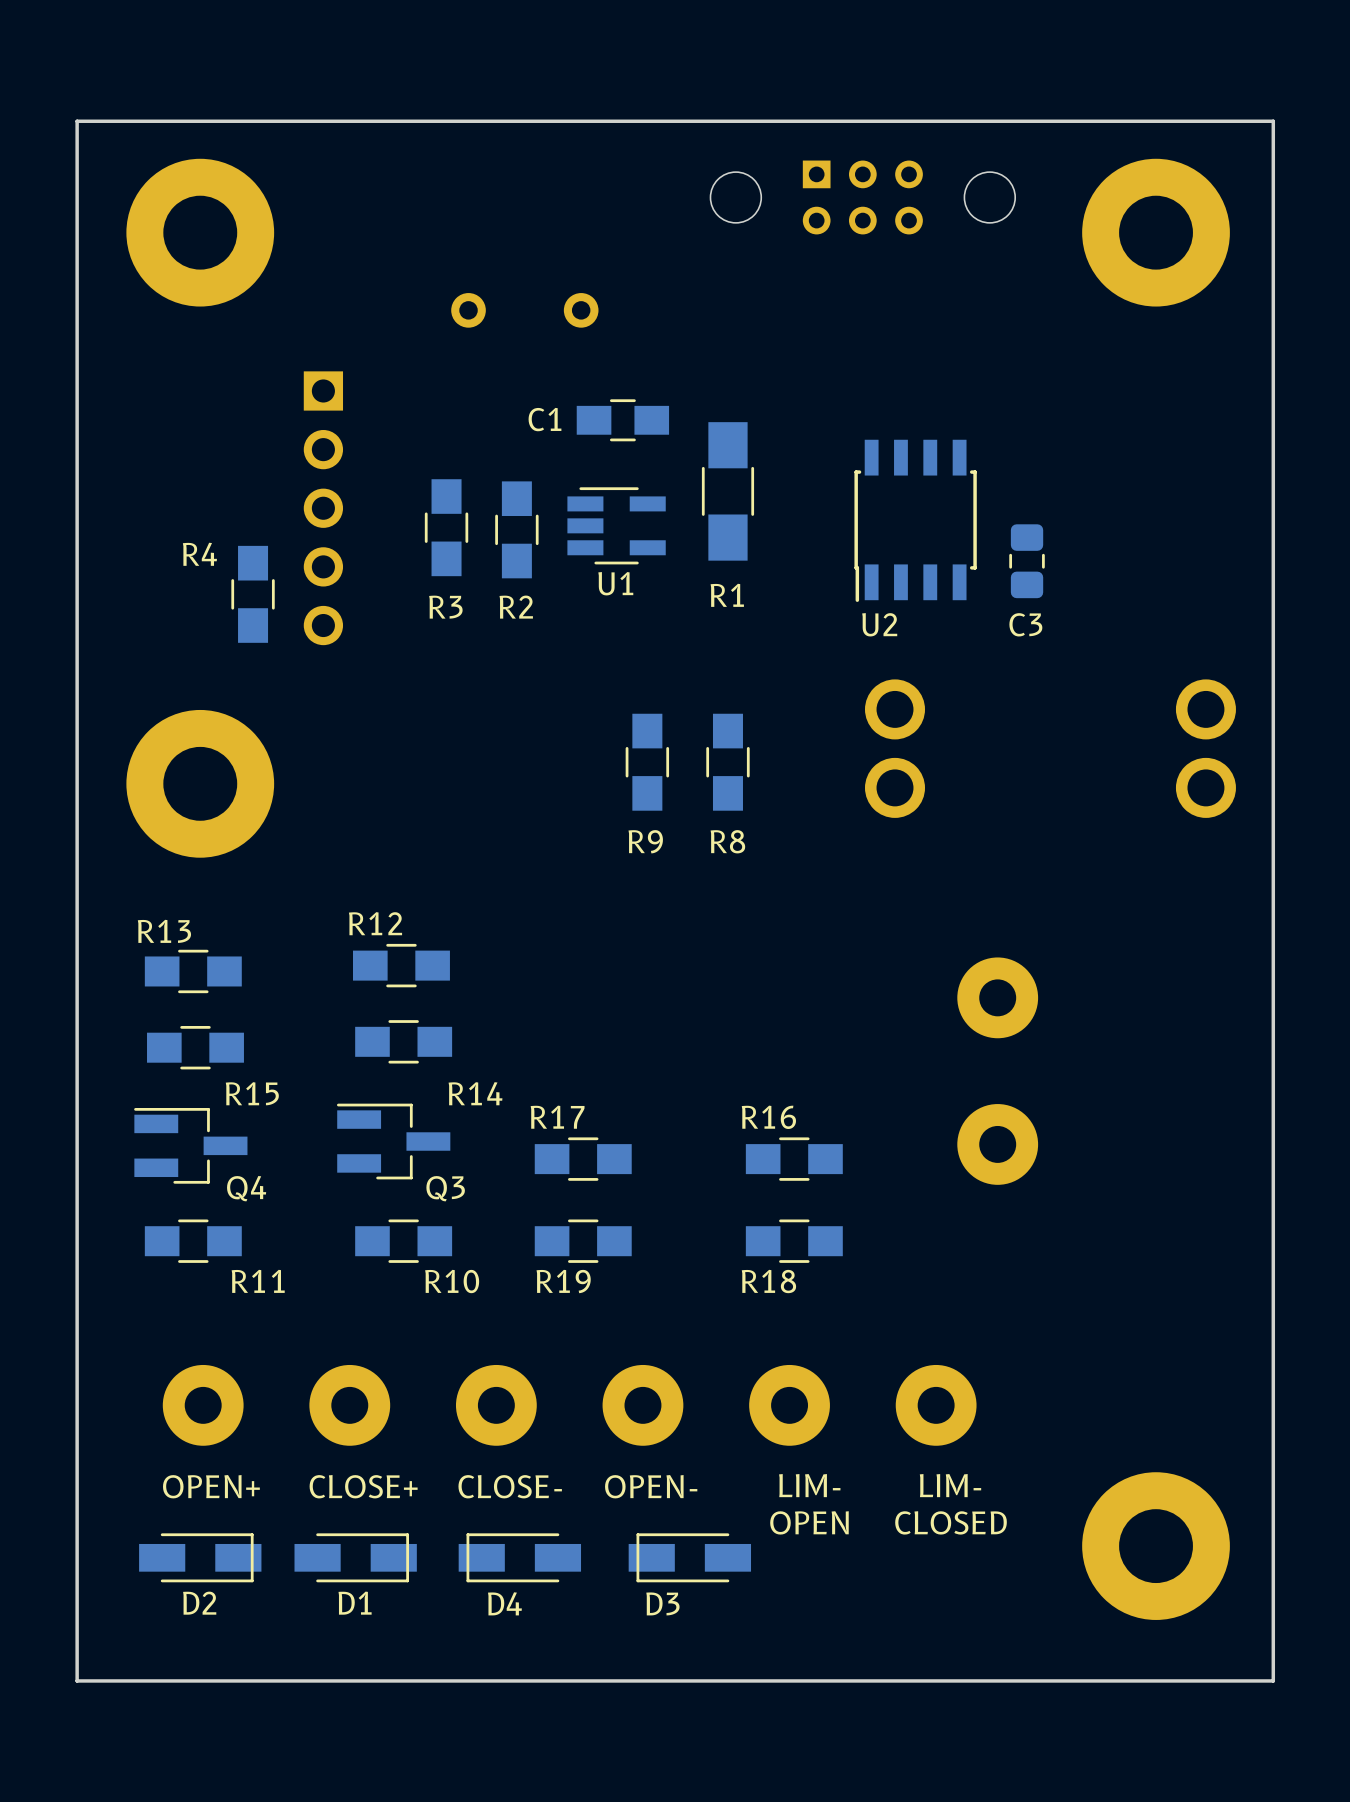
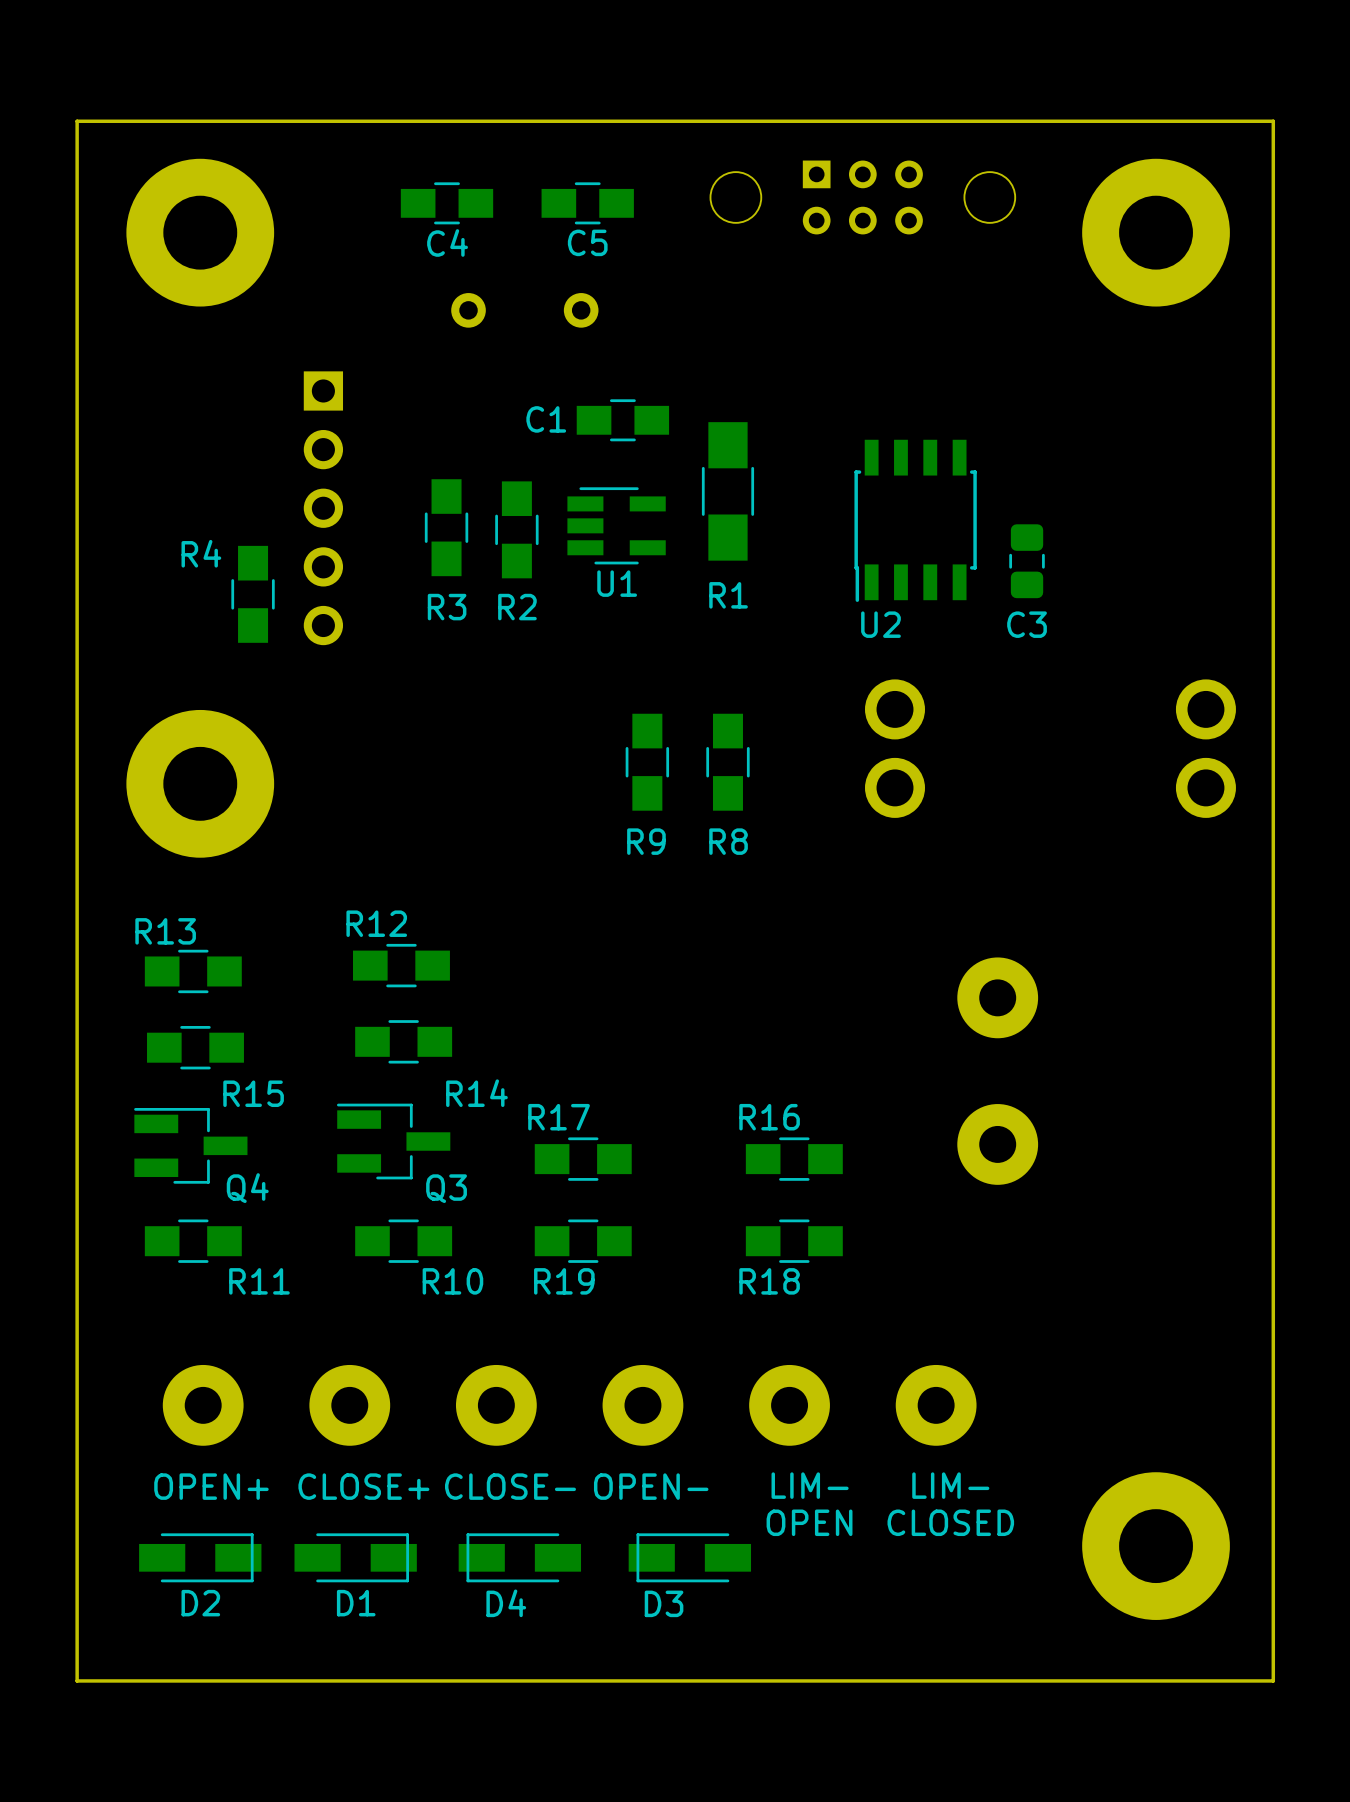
C4: none -> (446, 203)
C5: none -> (587, 203)

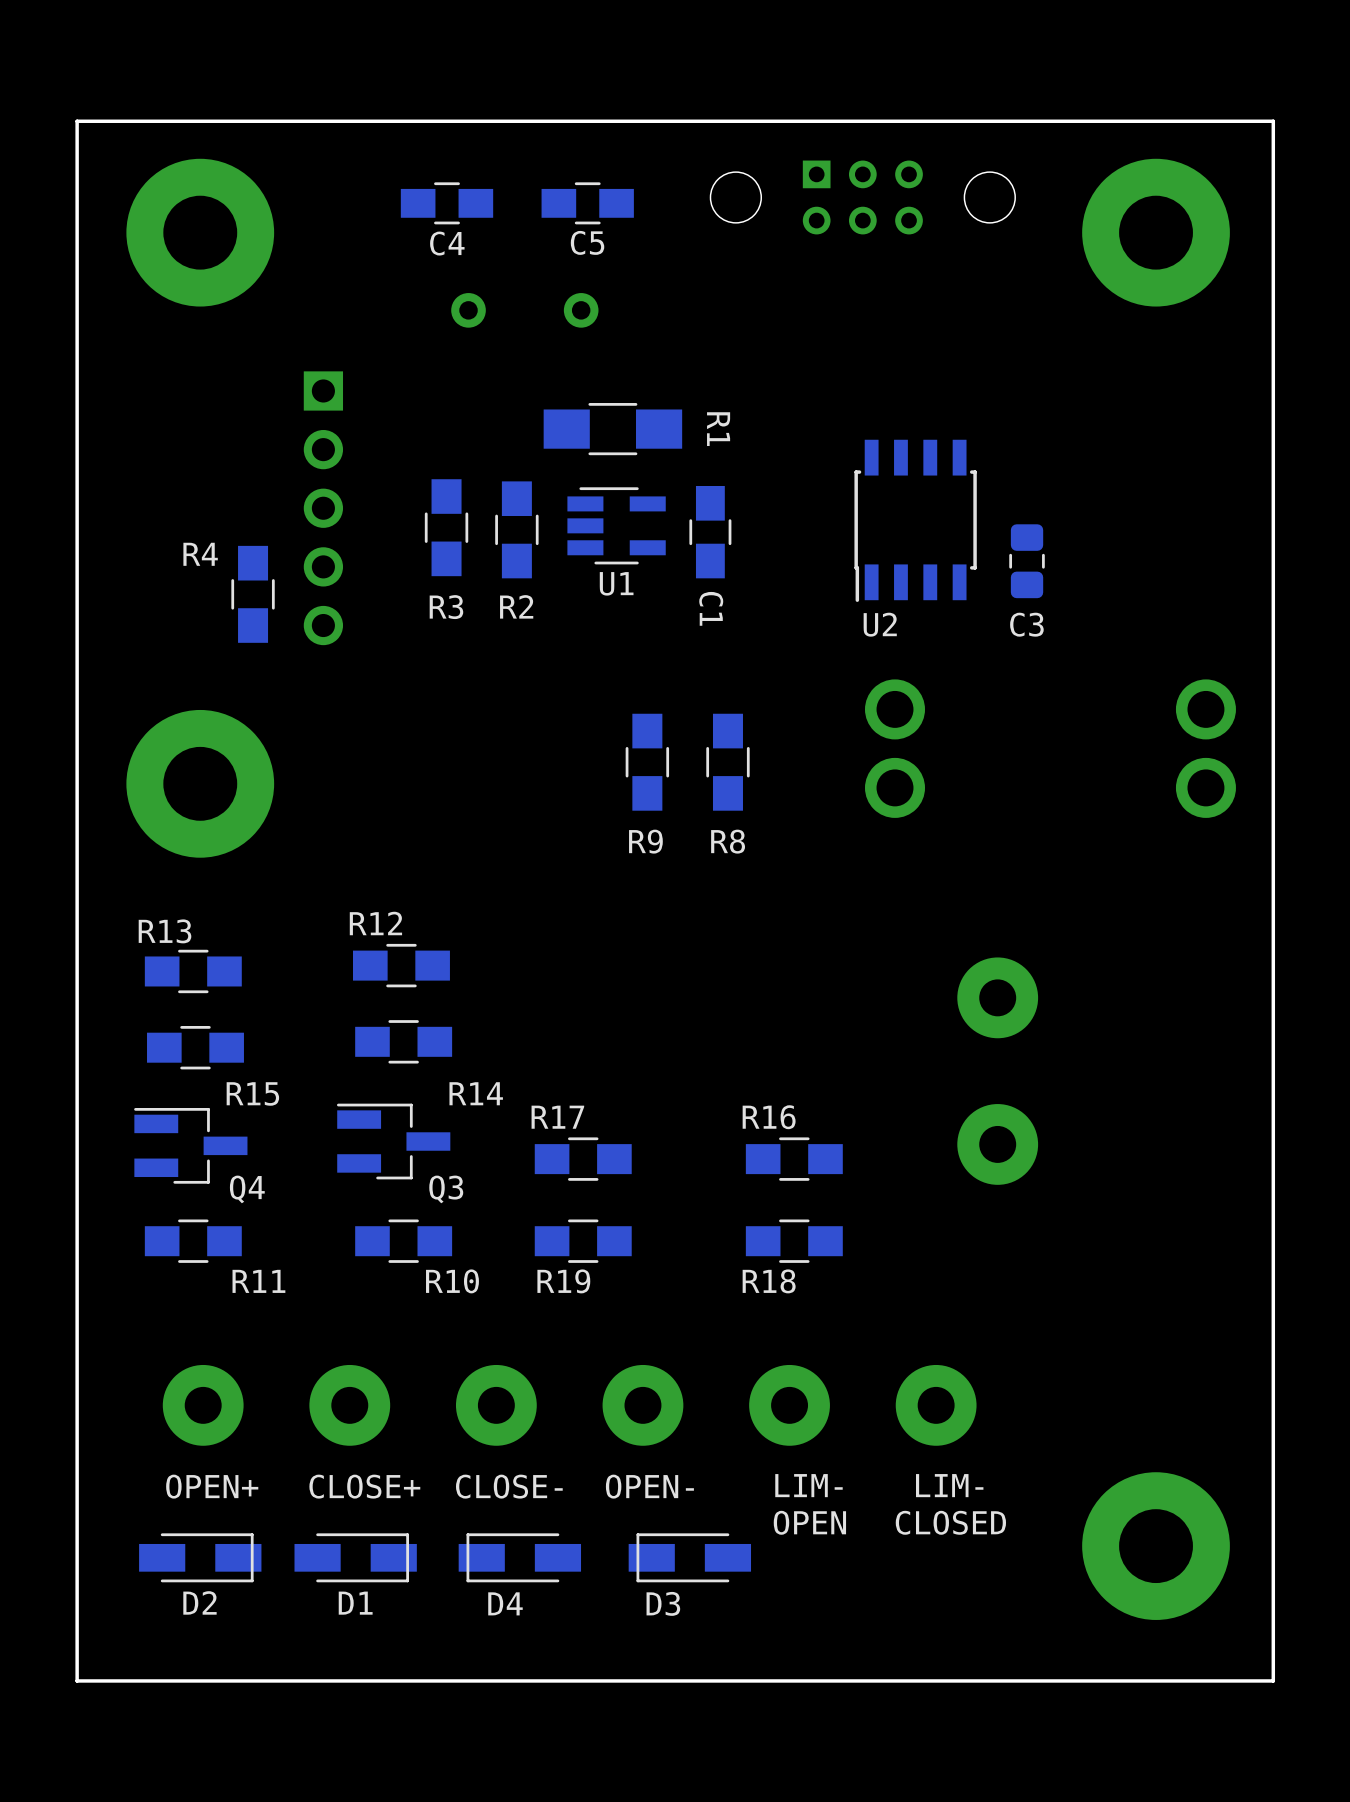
C1 name position: C1 (546, 419) -> C1 (711, 608)
C1 rotation: 0° (622, 420) -> 90° clockwise (710, 532)
C1 position: (622, 420) -> (710, 532)
R1 rotation: 0° (727, 491) -> 90° clockwise (612, 429)
R1 position: (727, 491) -> (612, 429)
R1 name position: R1 (728, 595) -> R1 (718, 429)

